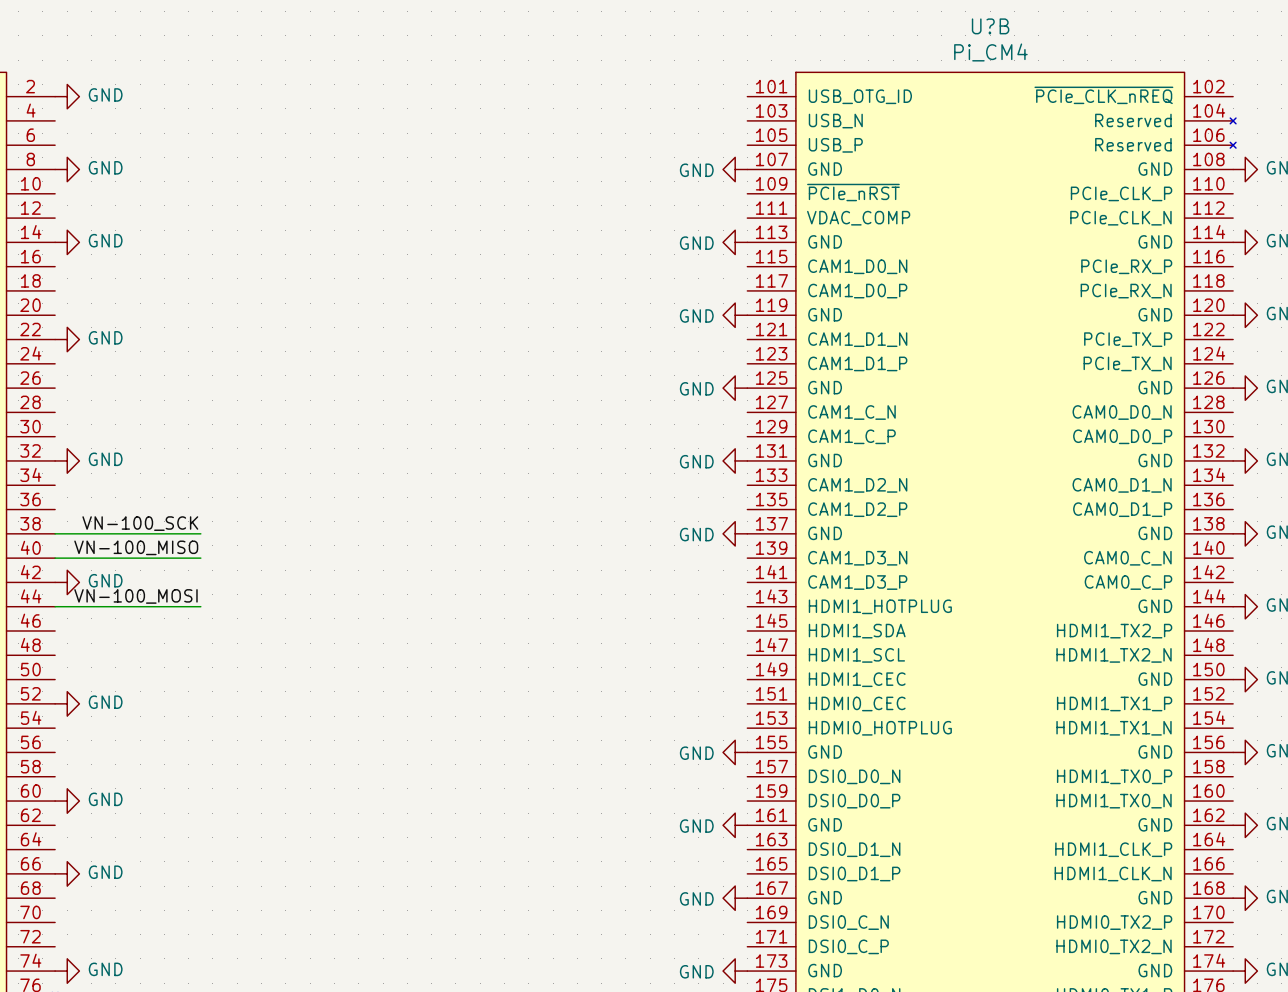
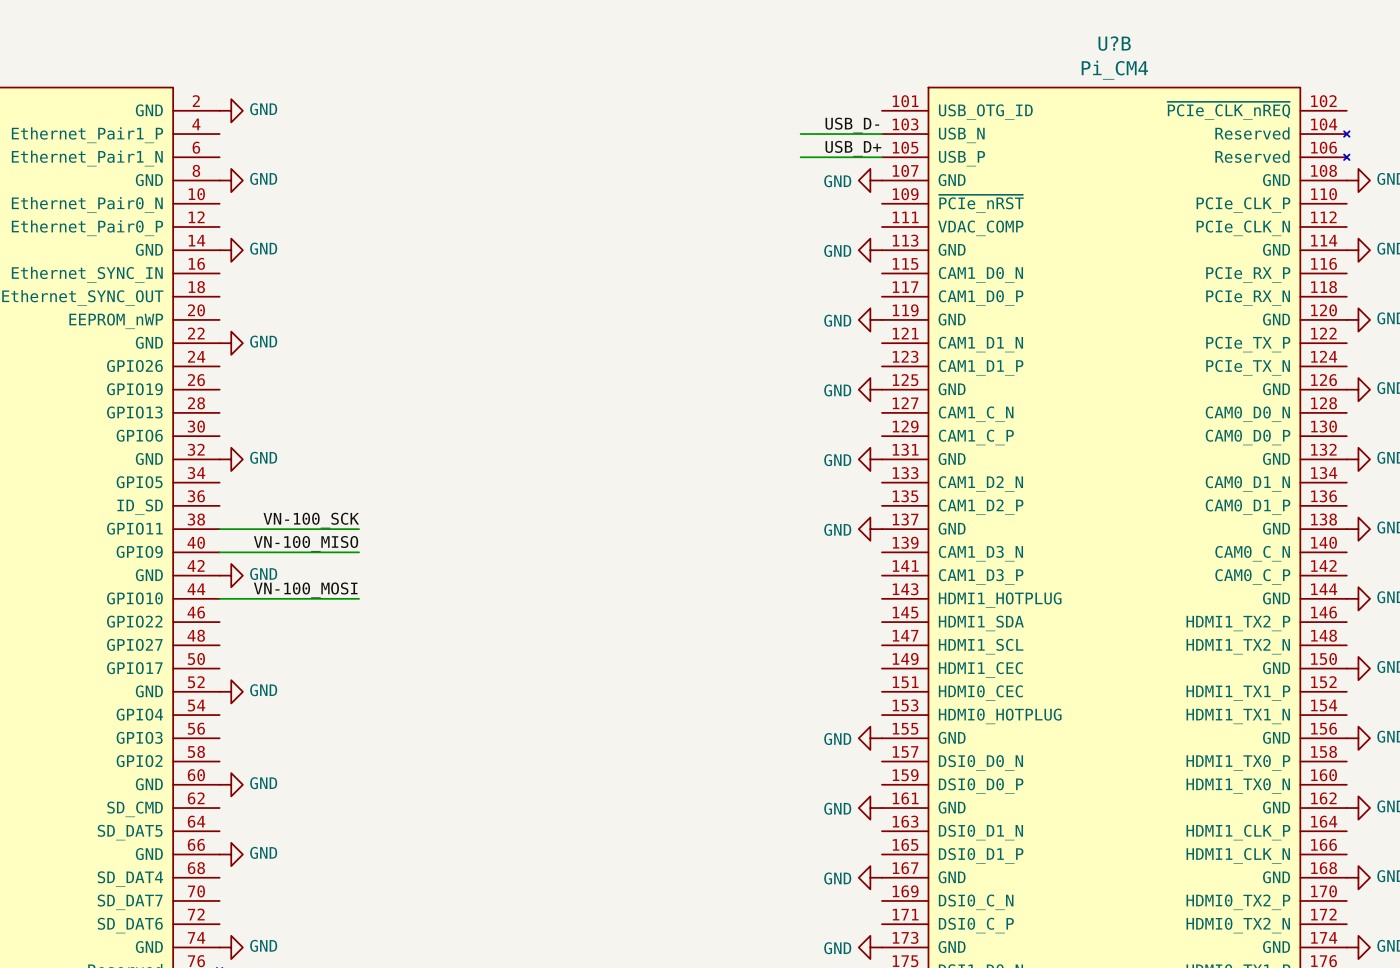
label: none -> USB_D- (852, 125)
wire: none -> (800, 134) (881, 134)
label: none -> USB_D+ (853, 148)
wire: none -> (800, 157) (881, 157)

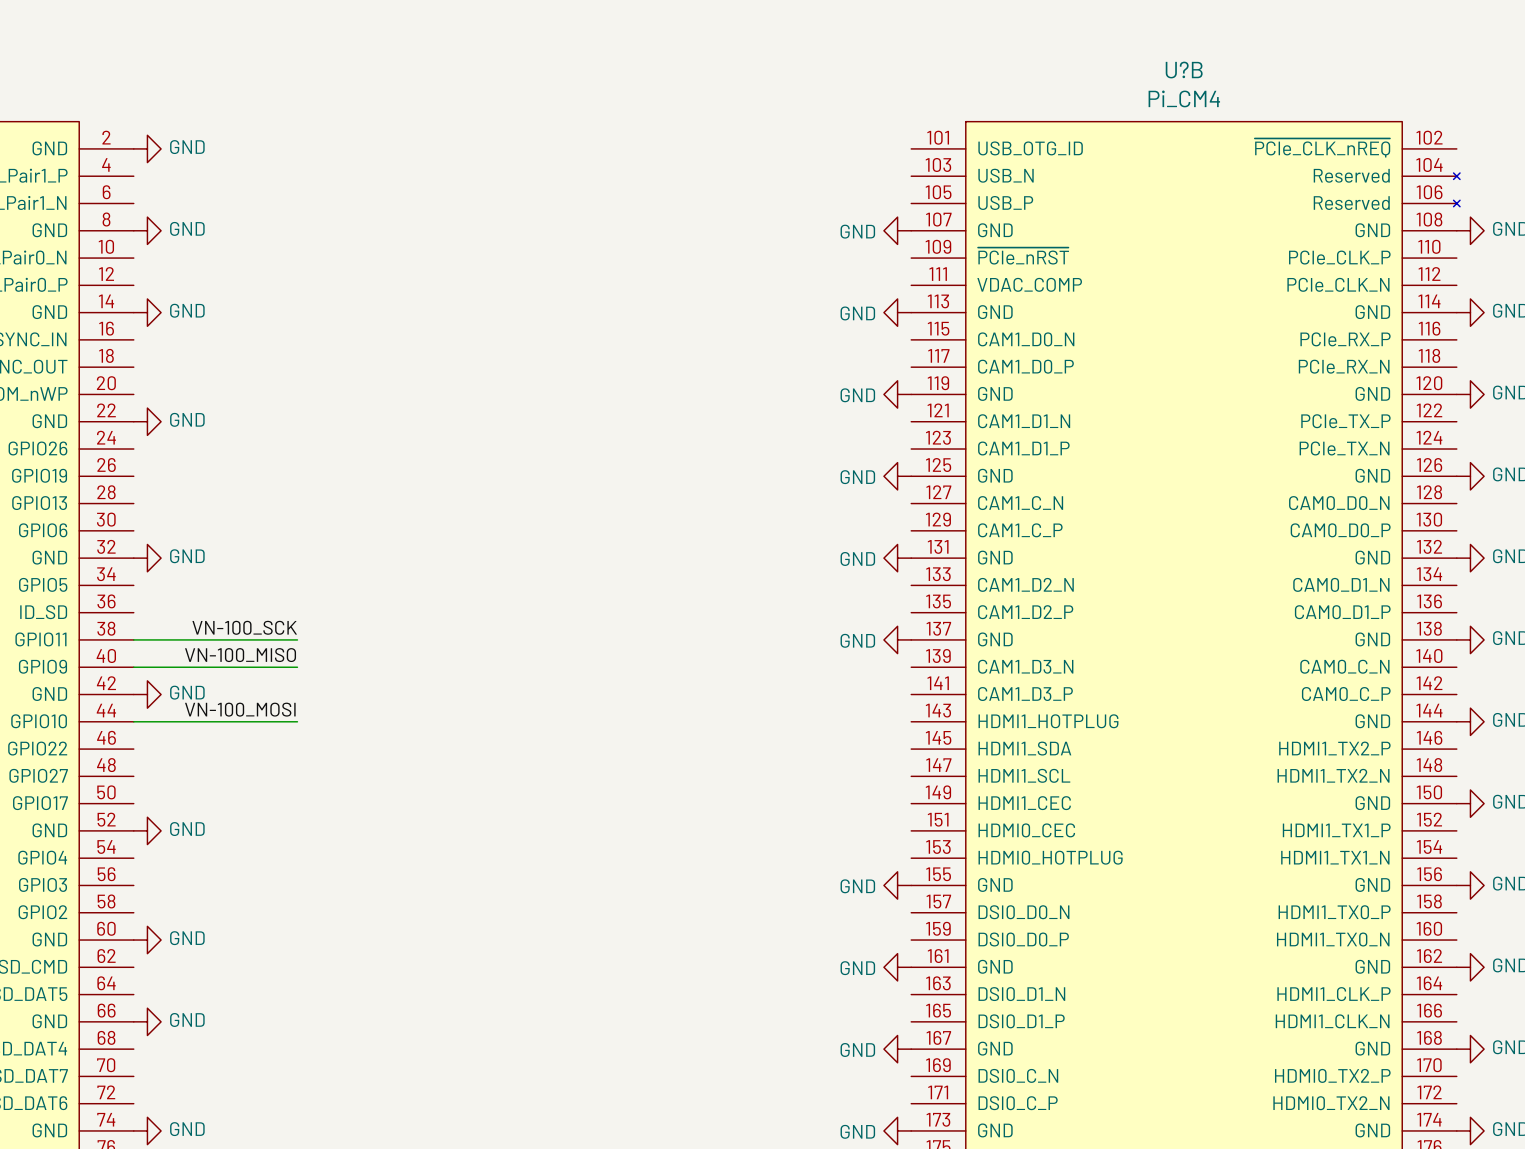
label: USB_D- (852, 125) -> none
wire: (800, 134) (881, 134) -> none
label: USB_D+ (853, 148) -> none
wire: (800, 157) (881, 157) -> none

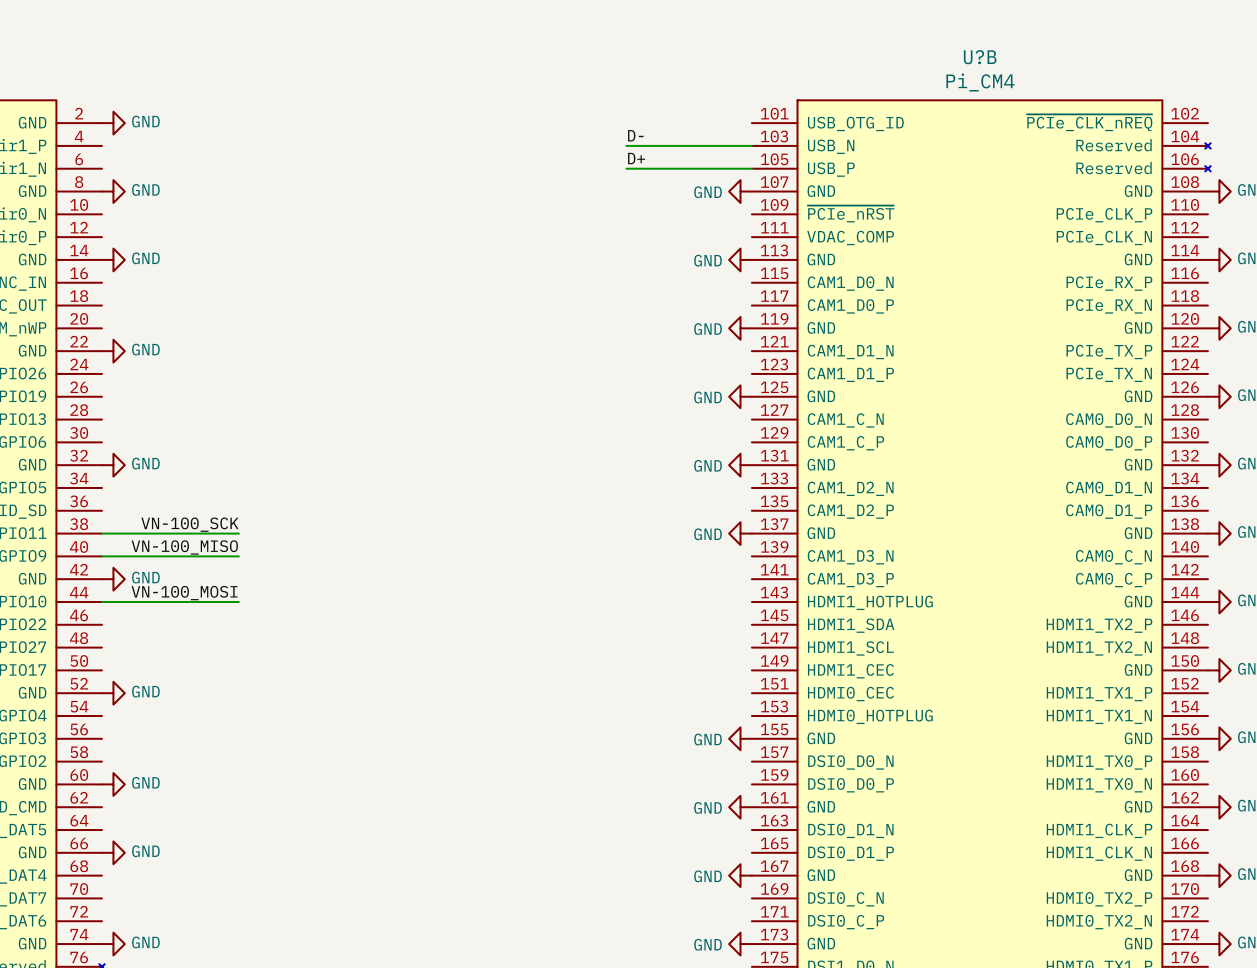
label: none -> D- (635, 135)
wire: none -> (626, 145) (751, 145)
label: none -> D+ (636, 158)
wire: none -> (626, 168) (751, 168)

